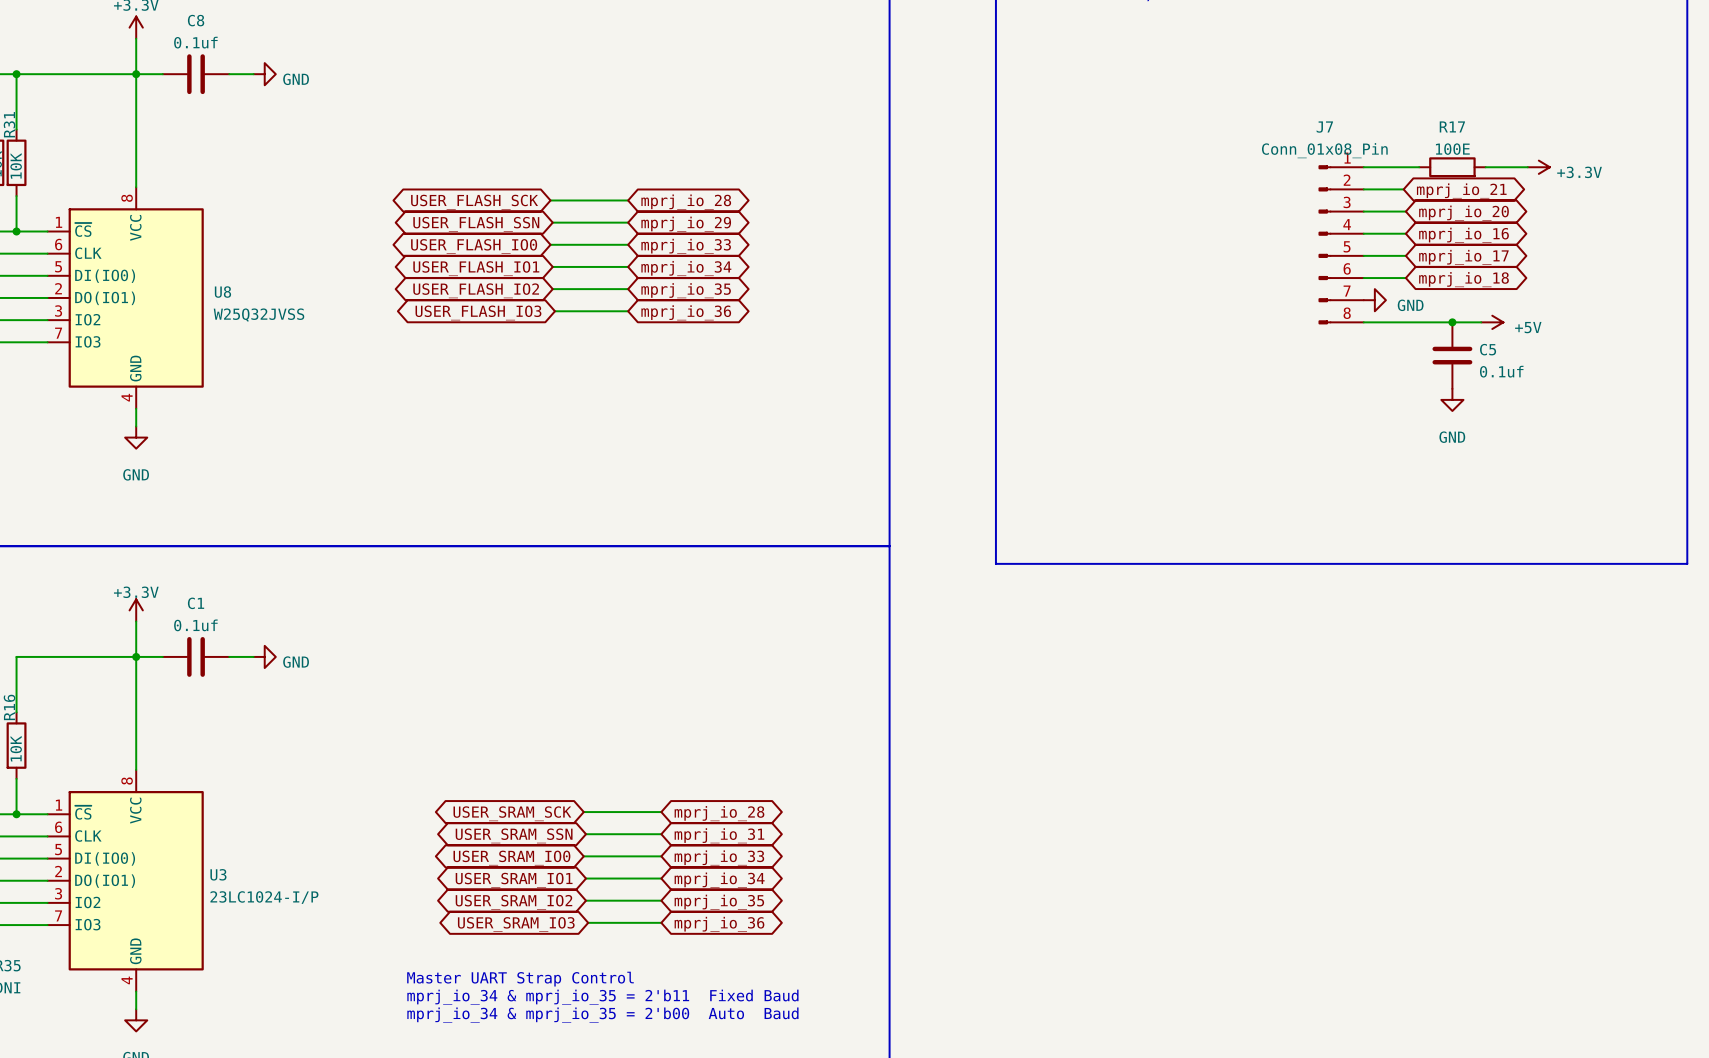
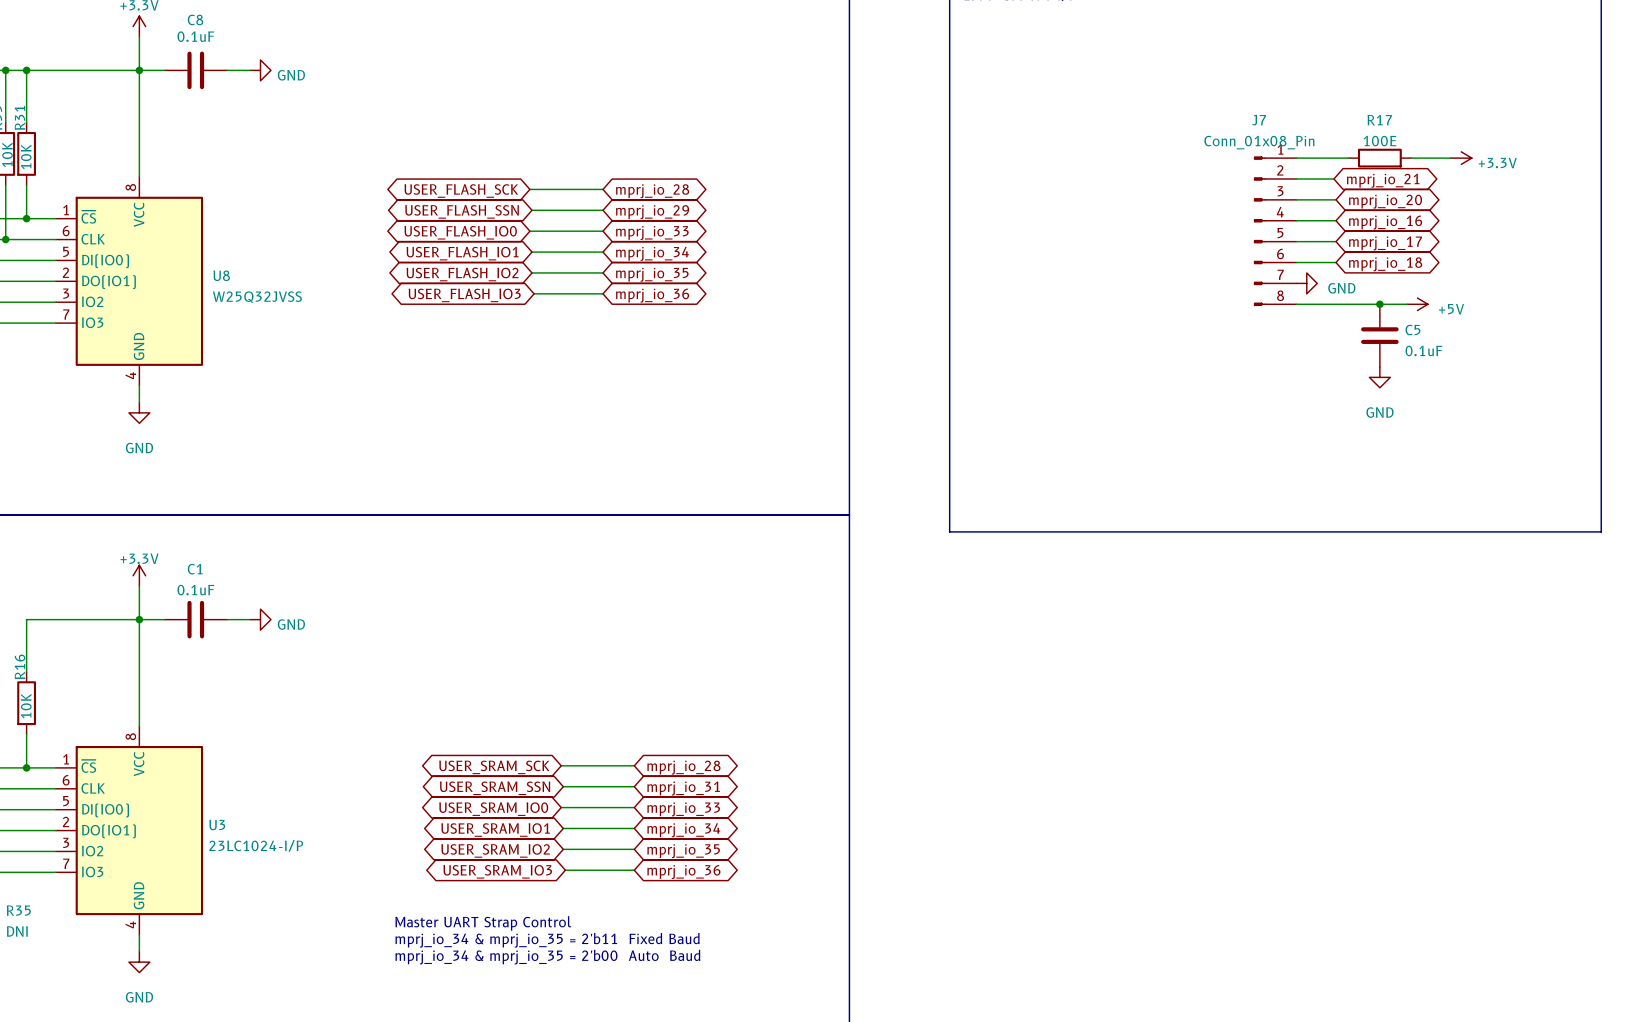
C8 value: 0.1uf (195, 42) -> 0.1uF (195, 36)
C5 value: 0.1uf (1501, 371) -> 0.1uF (1423, 350)
C1 value: 0.1uf (195, 625) -> 0.1uF (195, 590)

